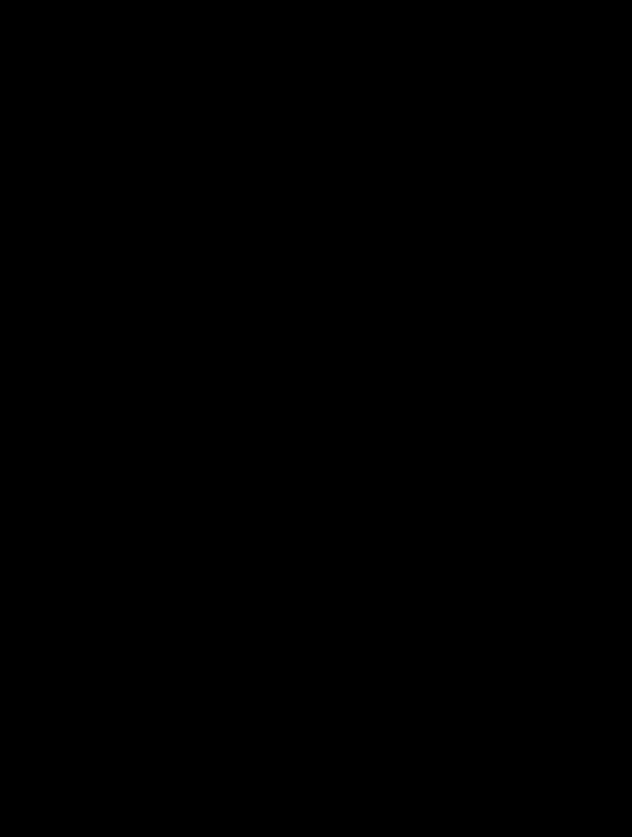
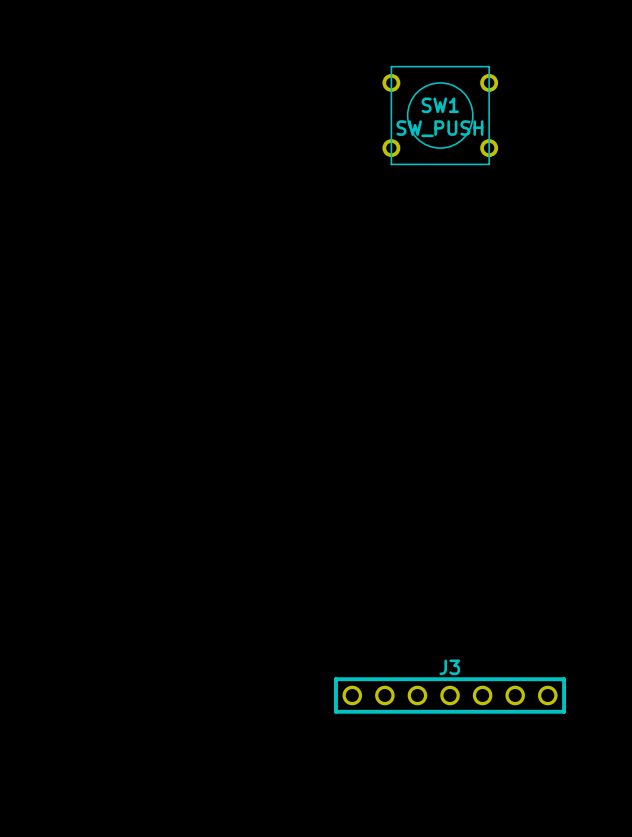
SW1: none -> SW_PUSH (440, 115)
J3: none -> (450, 695)

